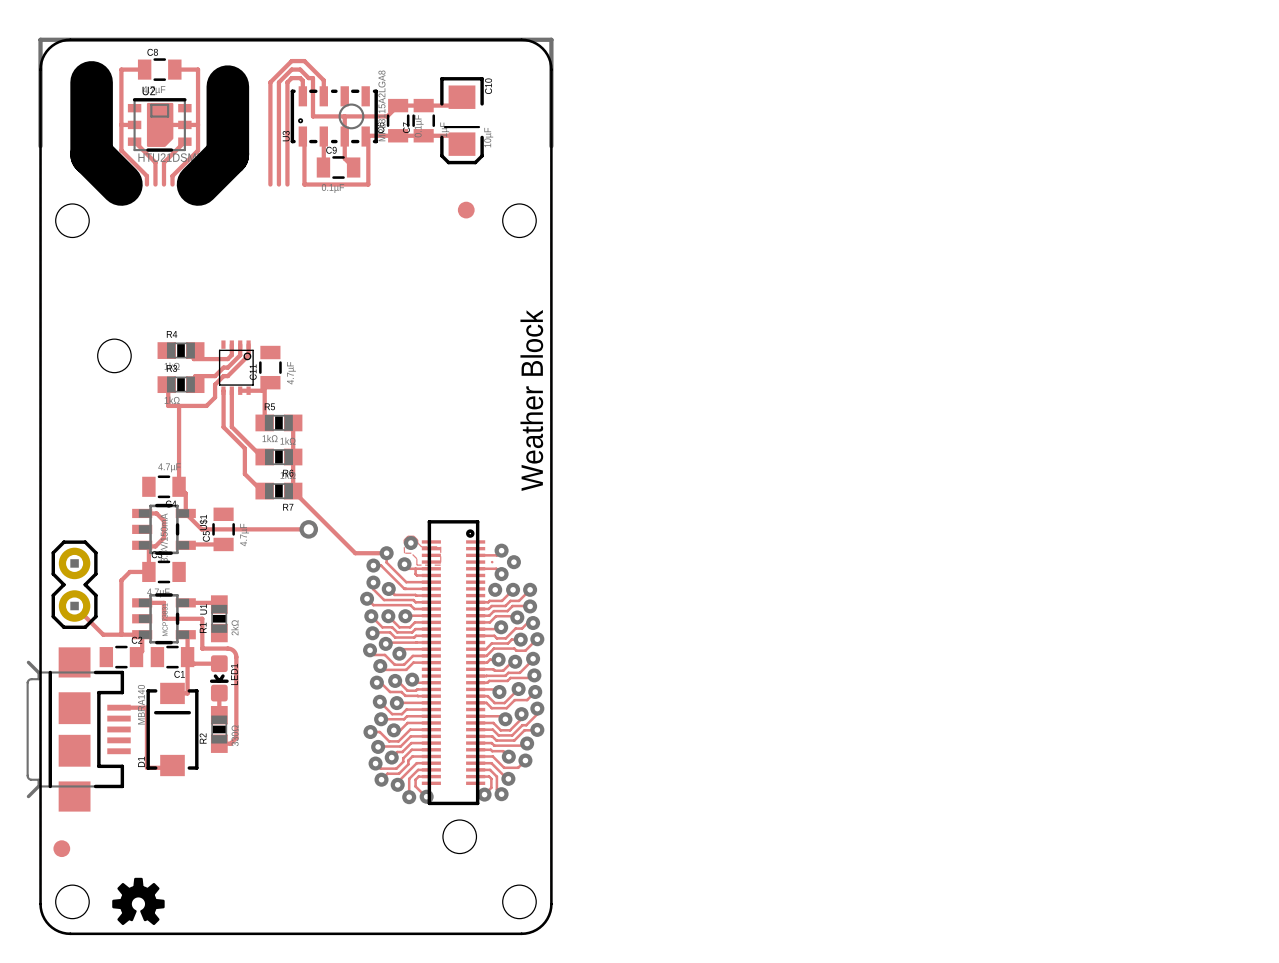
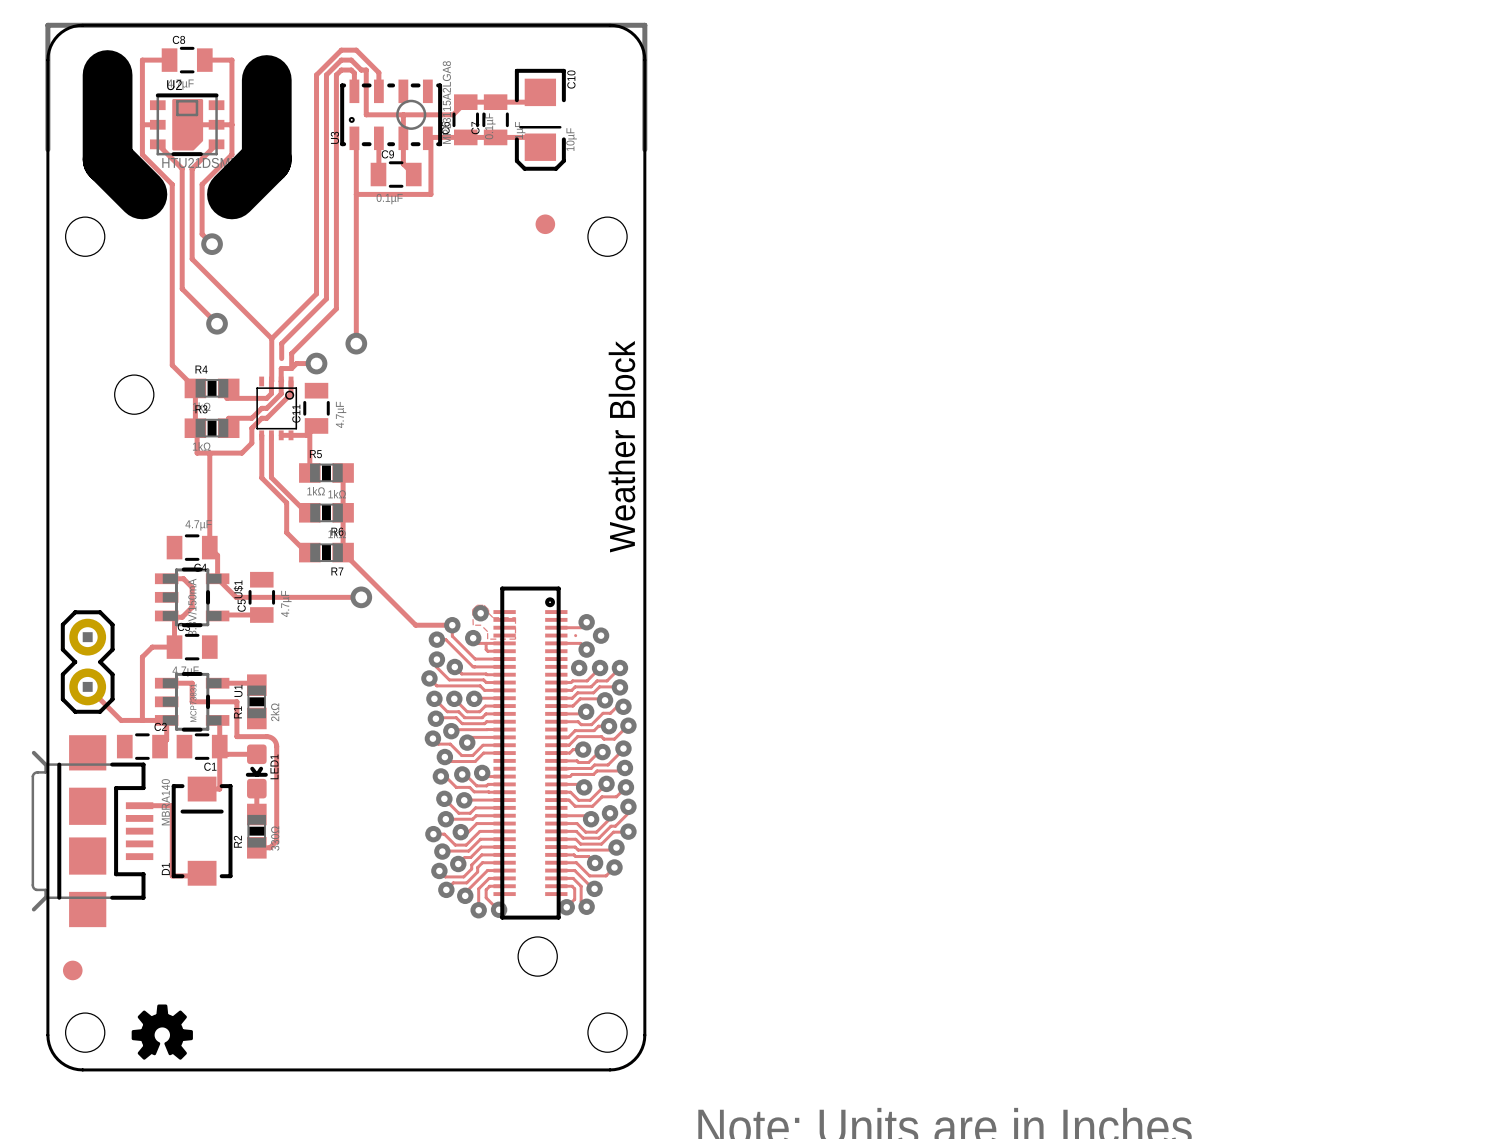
track: none -> (172, 194) (172, 365) (195, 388) (195, 428)
track: none -> (182, 194) (182, 288) (217, 323)
track: none -> (192, 194) (192, 259) (271, 338)
track: none -> (202, 194) (202, 234) (212, 244)
track: none -> (316, 194) (316, 293) (271, 338)
track: none -> (326, 194) (326, 298) (281, 343) (281, 358)
track: none -> (336, 194) (336, 308) (291, 353) (291, 368)
track: none -> (356, 194) (356, 343)
via: none -> (212, 244)
via: none -> (217, 323)
track: none -> (271, 338) (271, 381)
via: none -> (356, 343)
track: none -> (316, 363) (296, 363) (291, 368)
via: none -> (316, 363)
track: none -> (291, 368) (281, 368) (281, 381)

